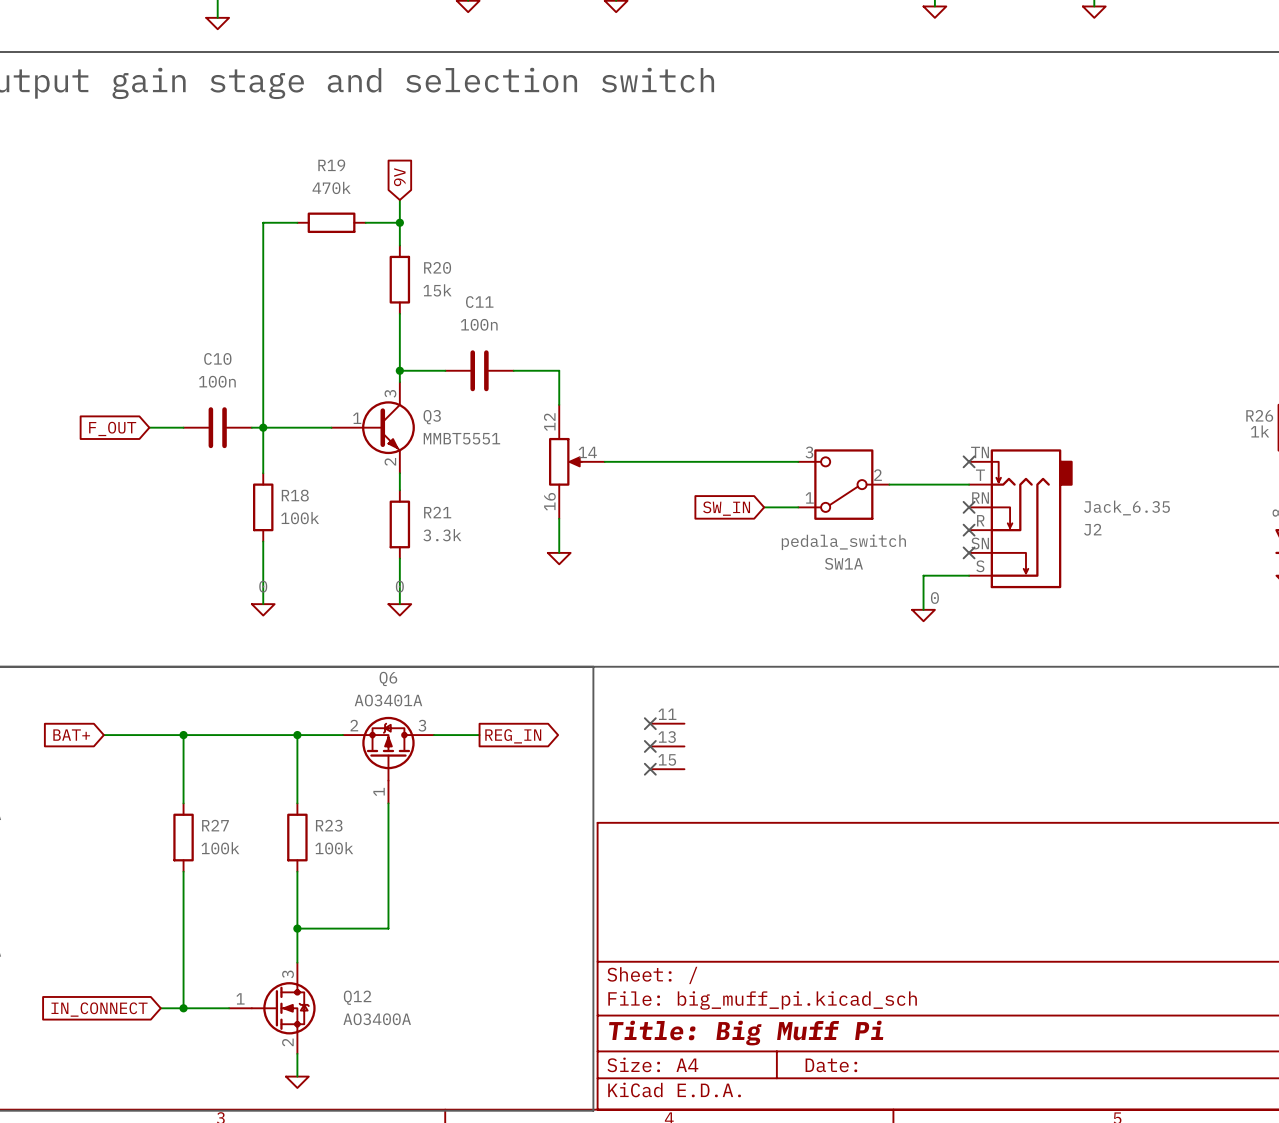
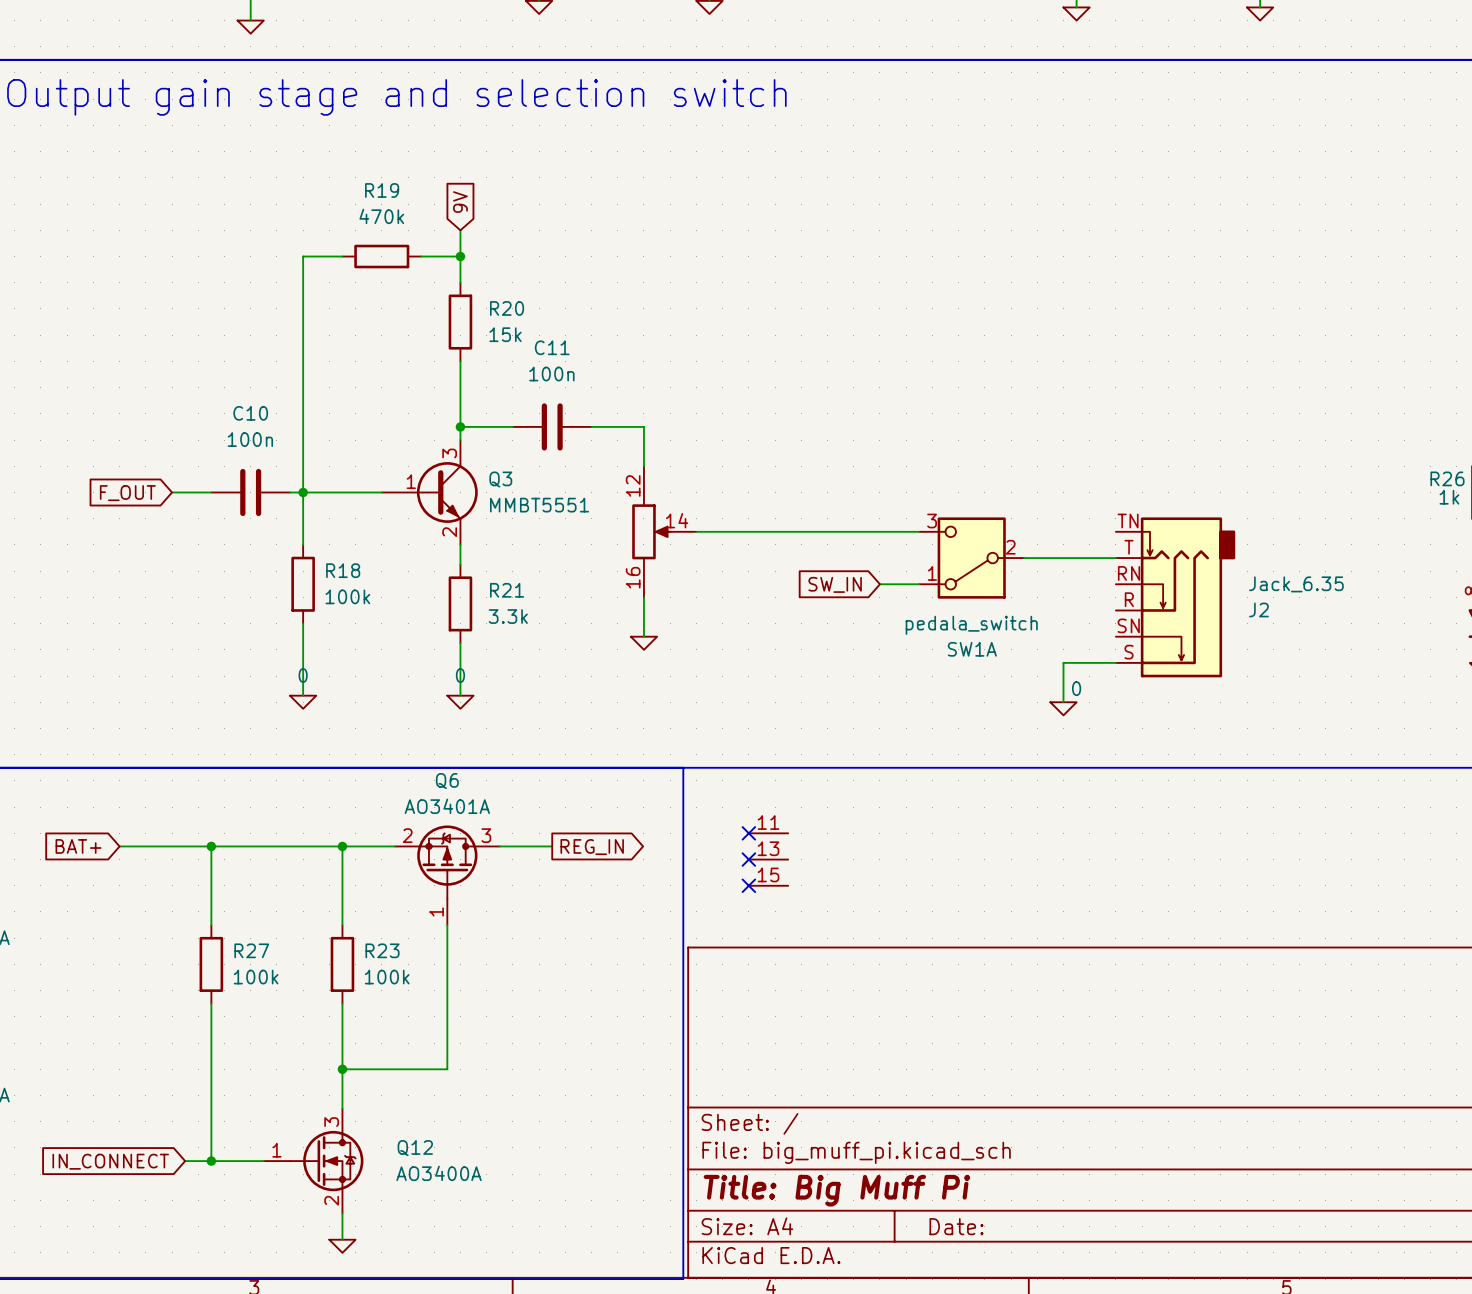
no-connect mark: (969, 461) -> none
no-connect mark: (969, 507) -> none
no-connect mark: (969, 530) -> none
no-connect mark: (969, 552) -> none

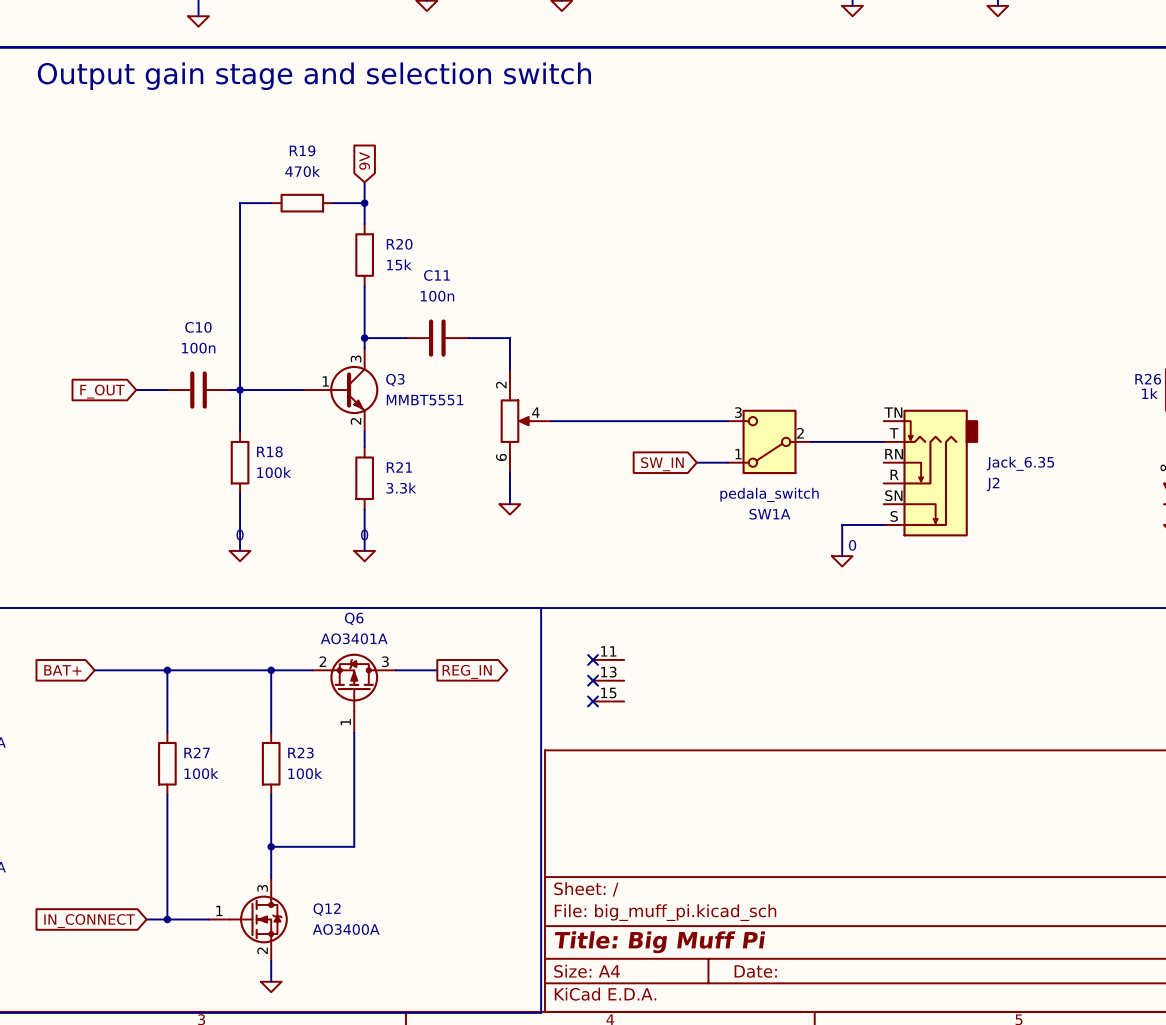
part pin number: 12 (633, 485) -> 2 (501, 385)
part pin number: 14 (677, 520) -> 4 (535, 412)
part pin number: 16 (633, 577) -> 6 (501, 457)

